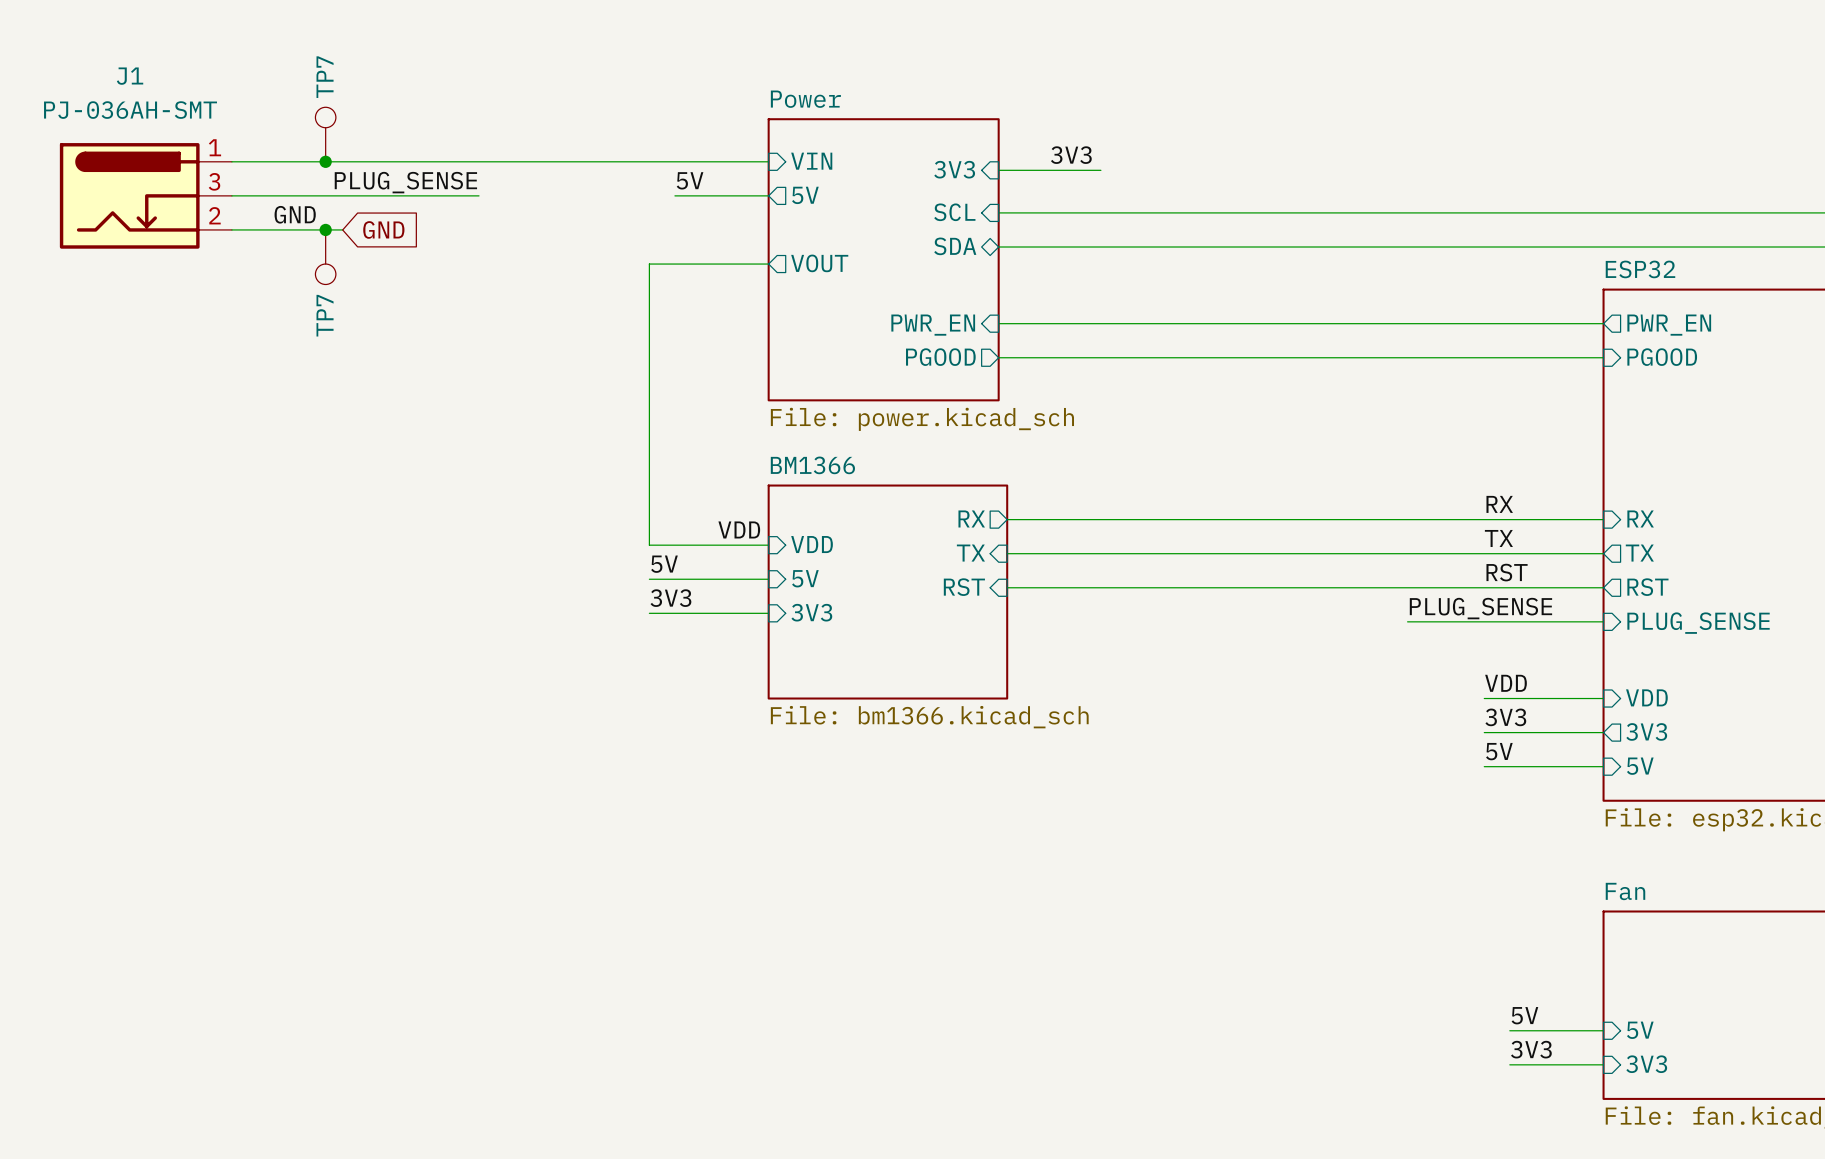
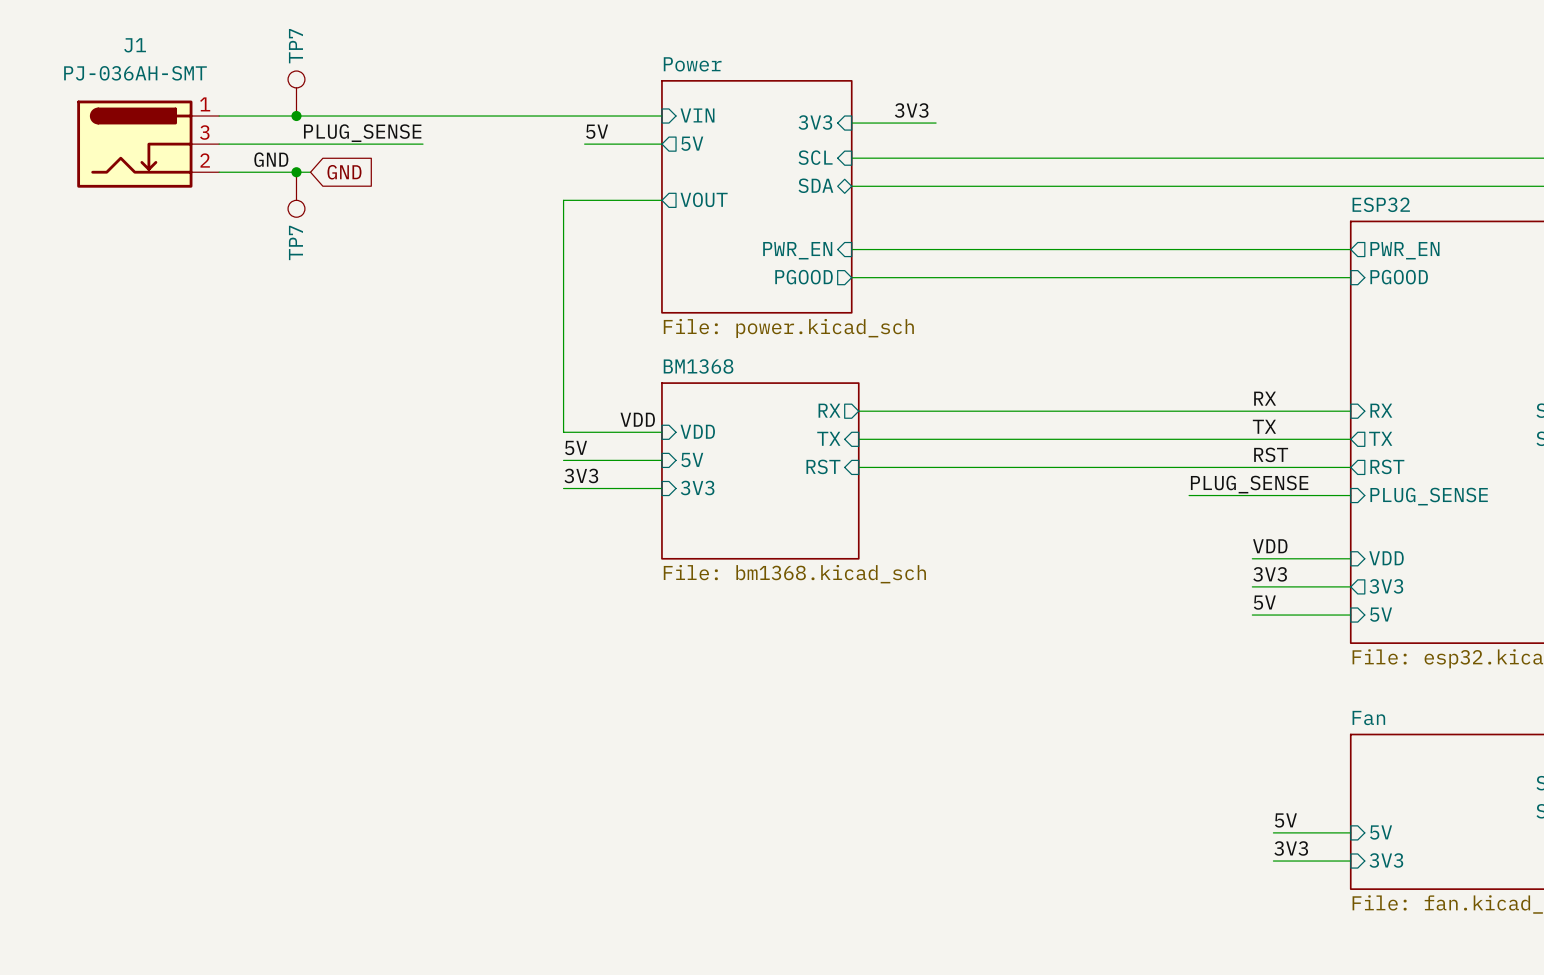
sheet BM1366 name: BM1366 (812, 465) -> BM1368 (698, 366)
sheet BM1366 value: File: bm1366.kicad_sch (929, 717) -> File: bm1368.kicad_sch (794, 574)

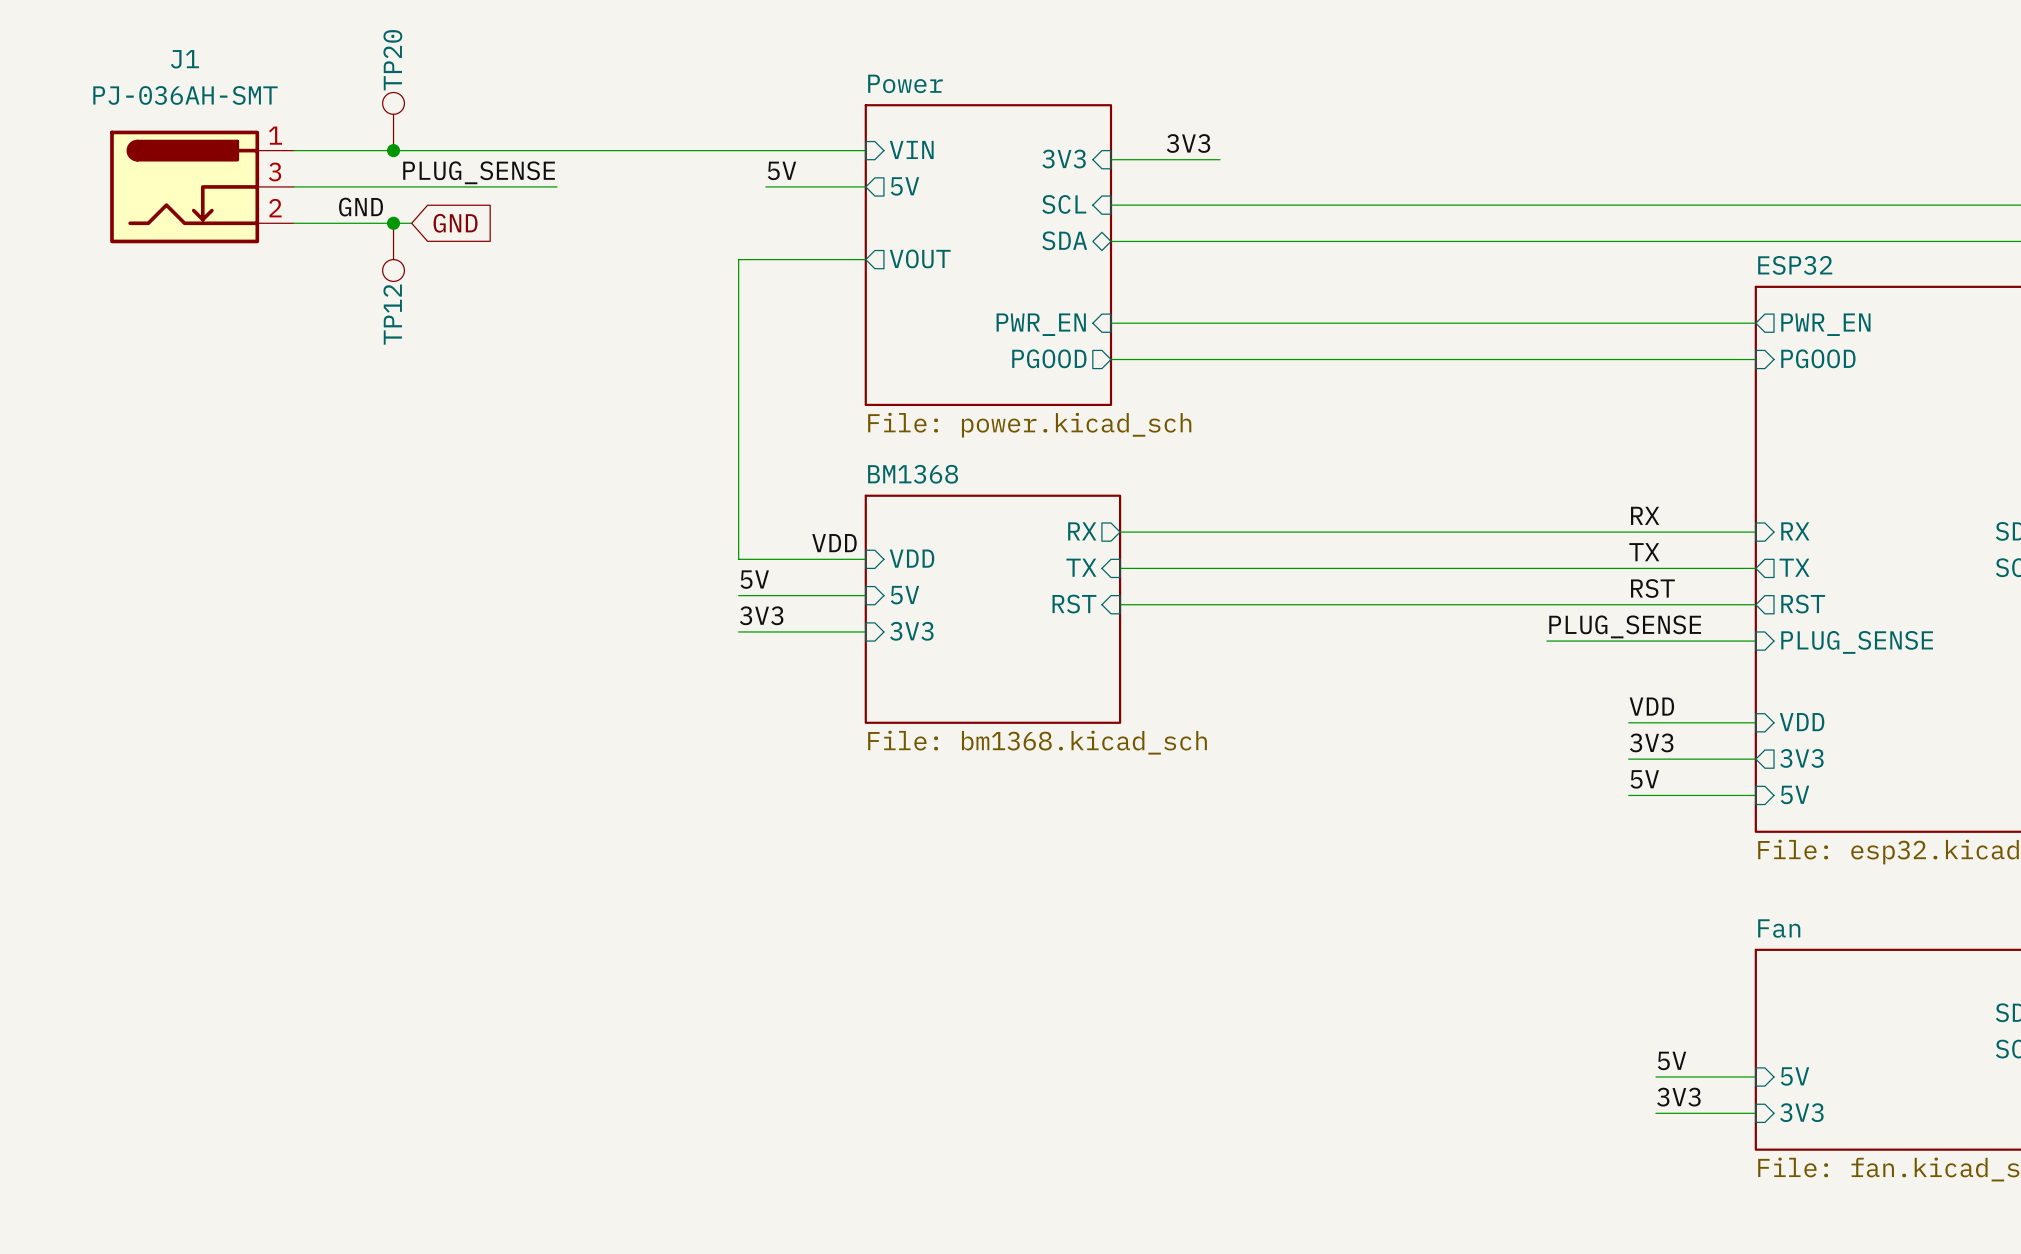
TP7 name: TP7 (295, 46) -> TP20 (392, 60)
TP7 name: TP7 (295, 242) -> TP12 (392, 314)

